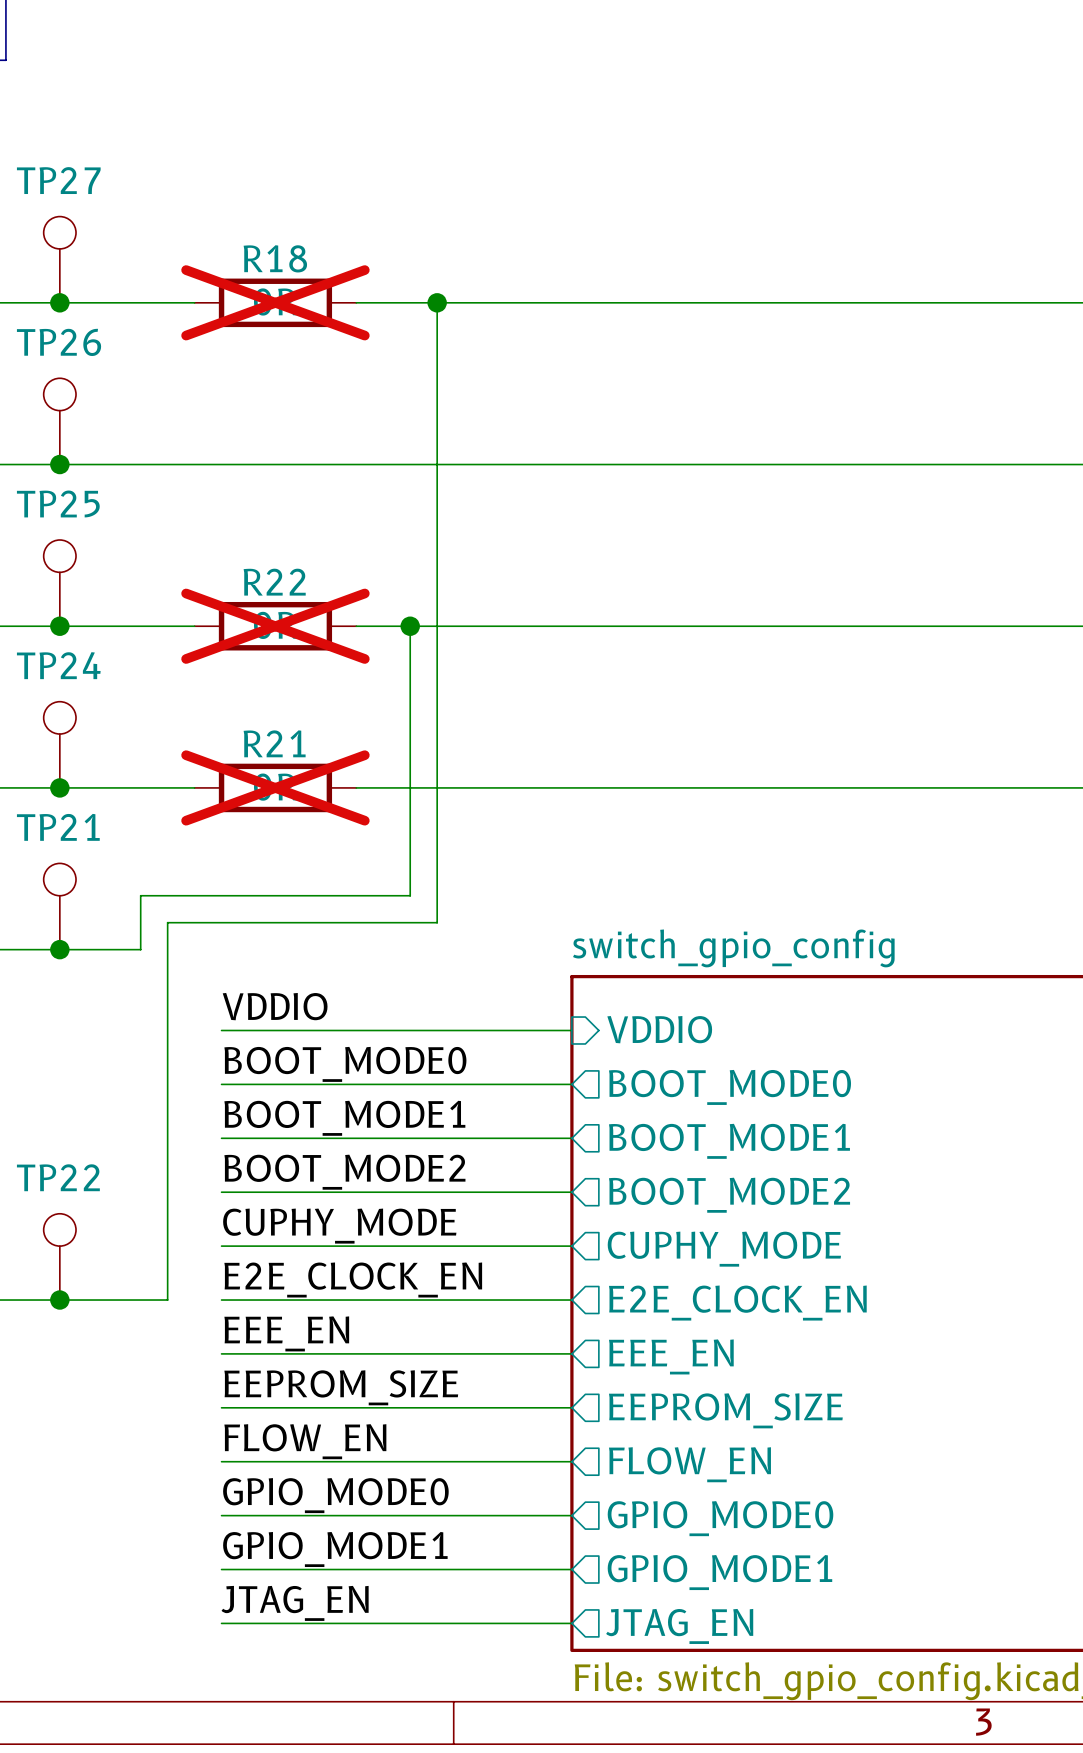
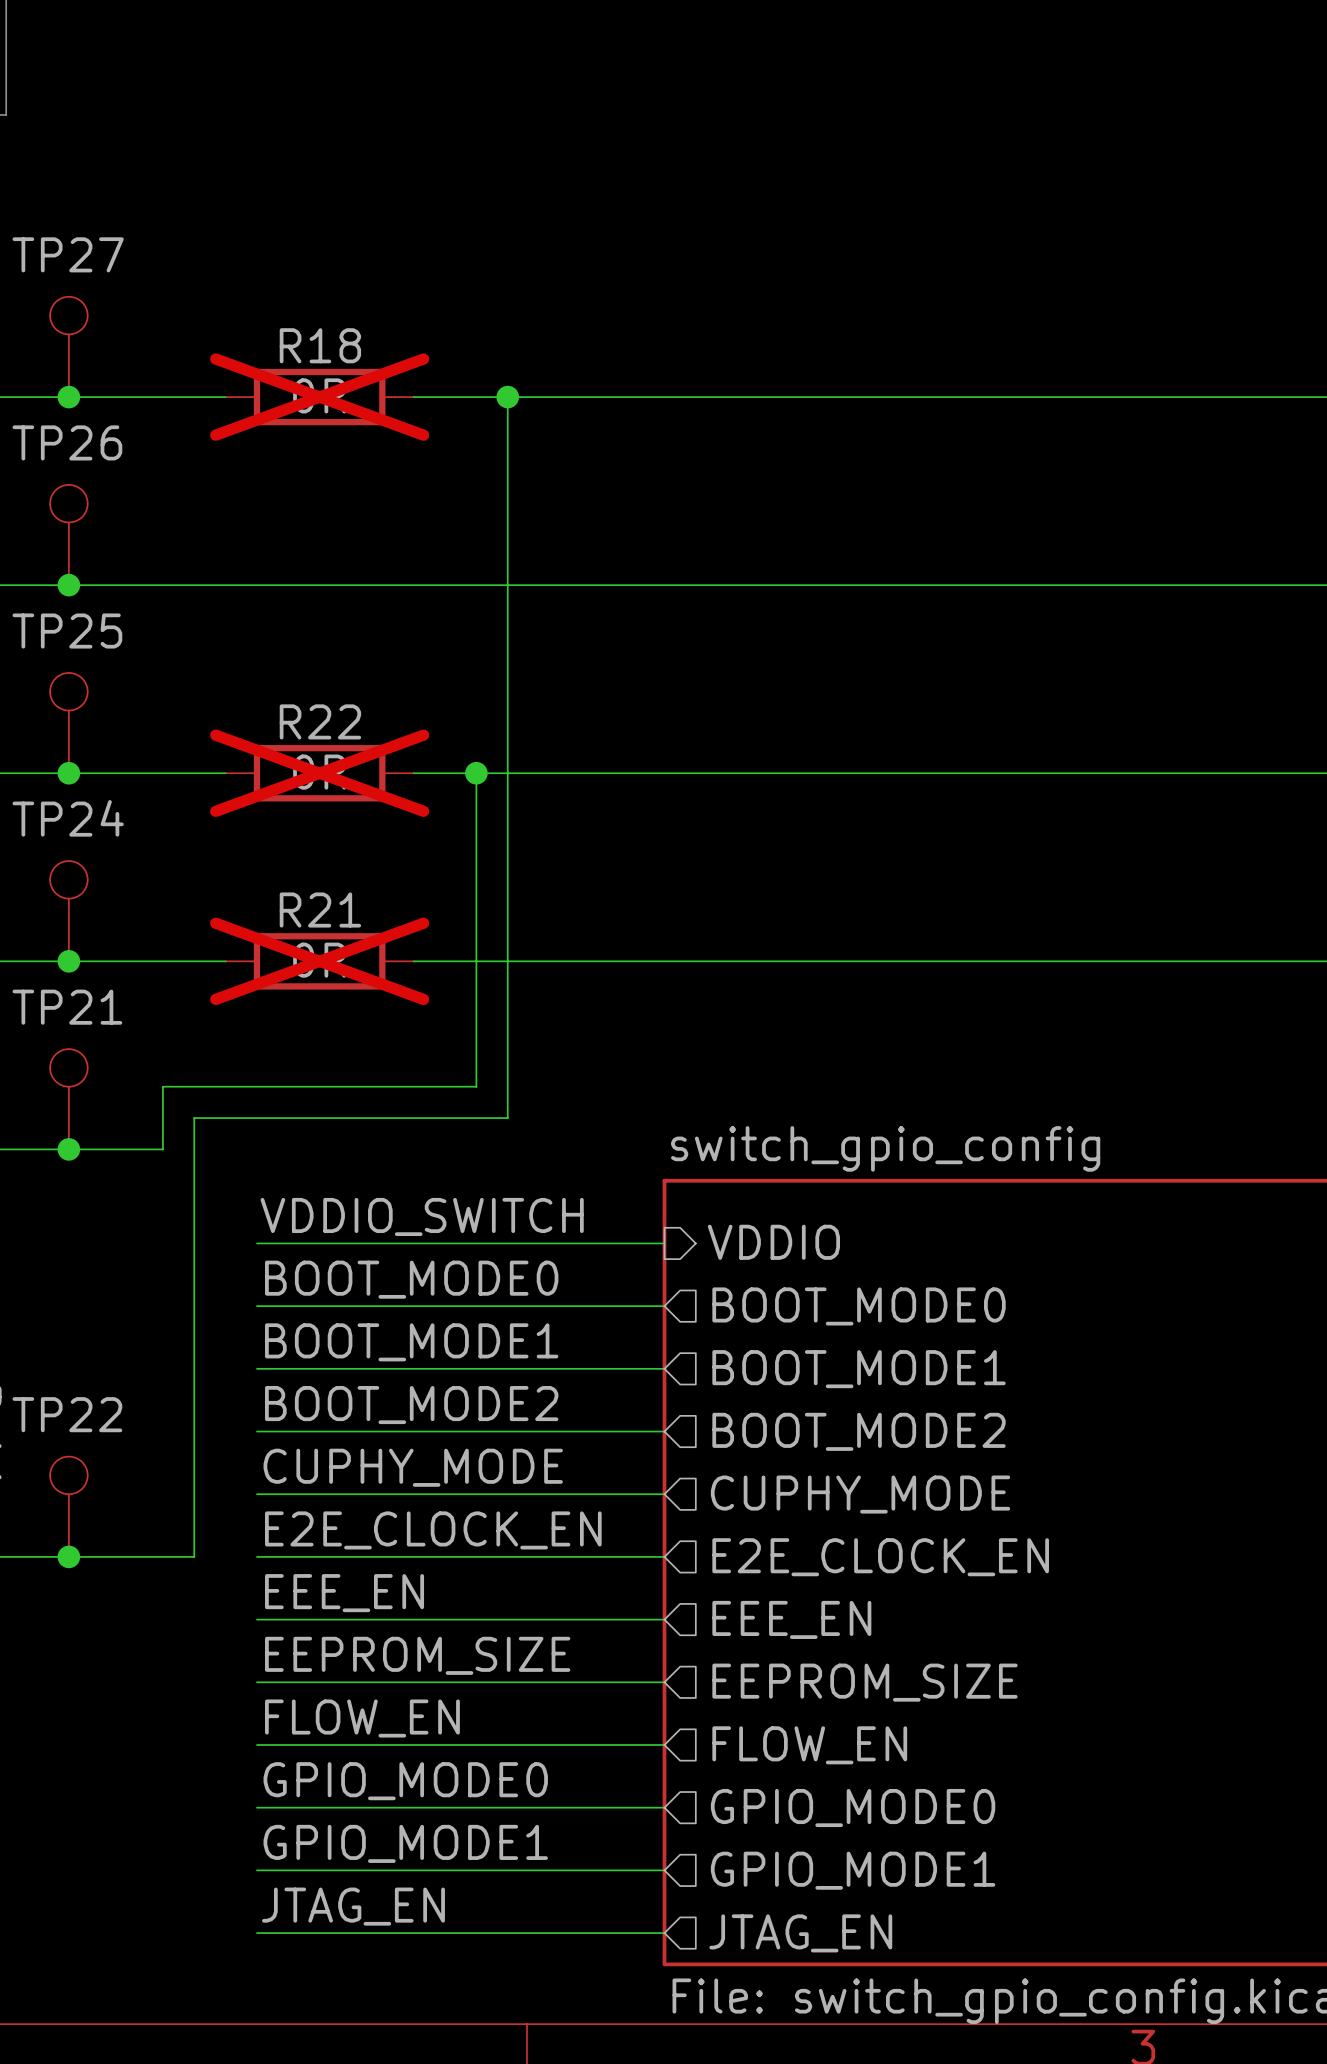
label: VDDIO (275, 1006) -> VDDIO_SWITCH (422, 1216)

